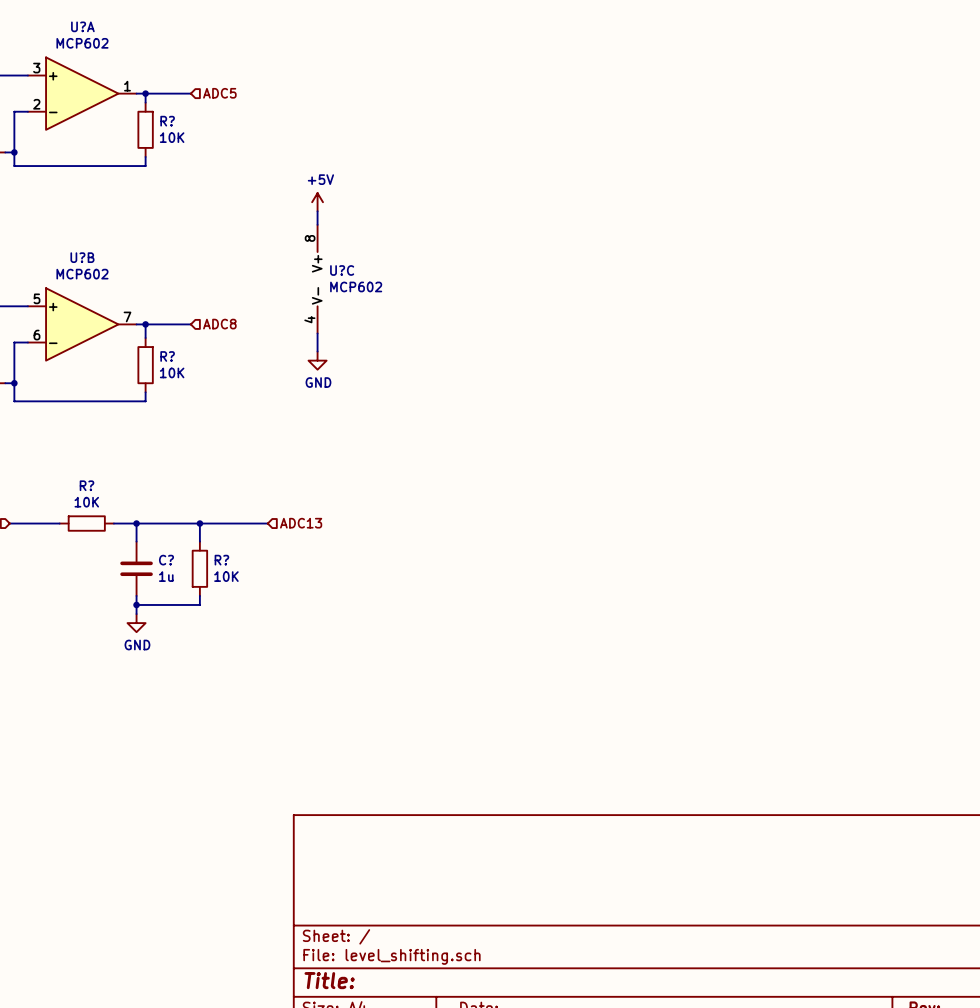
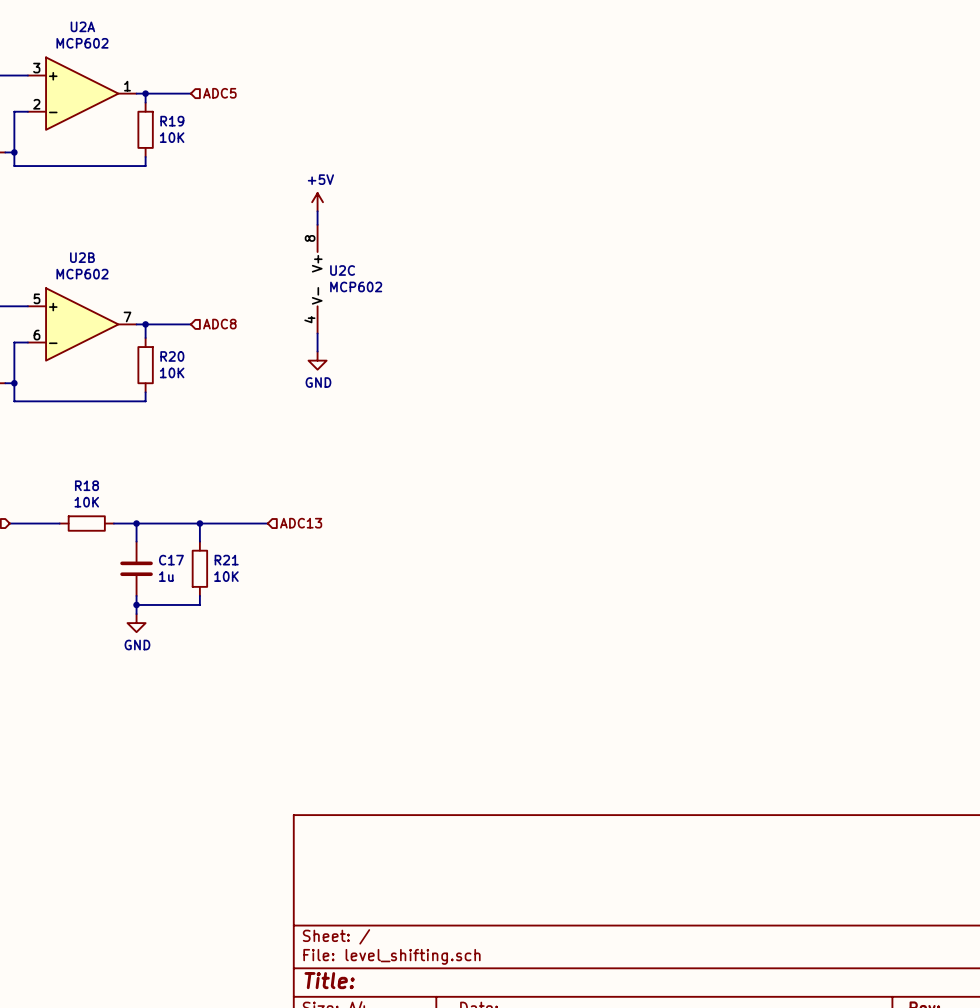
U?A name: U?A (82, 26) -> U2A (82, 26)
R? name: R? (167, 121) -> R19 (172, 121)
U?B name: U?B (82, 257) -> U2B (82, 257)
U?C name: U?C (342, 270) -> U2C (342, 270)
R? name: R? (167, 356) -> R20 (172, 356)
R? name: R? (86, 485) -> R18 (86, 485)
C? name: C? (166, 560) -> C17 (171, 560)
R? name: R? (221, 560) -> R21 (226, 560)

